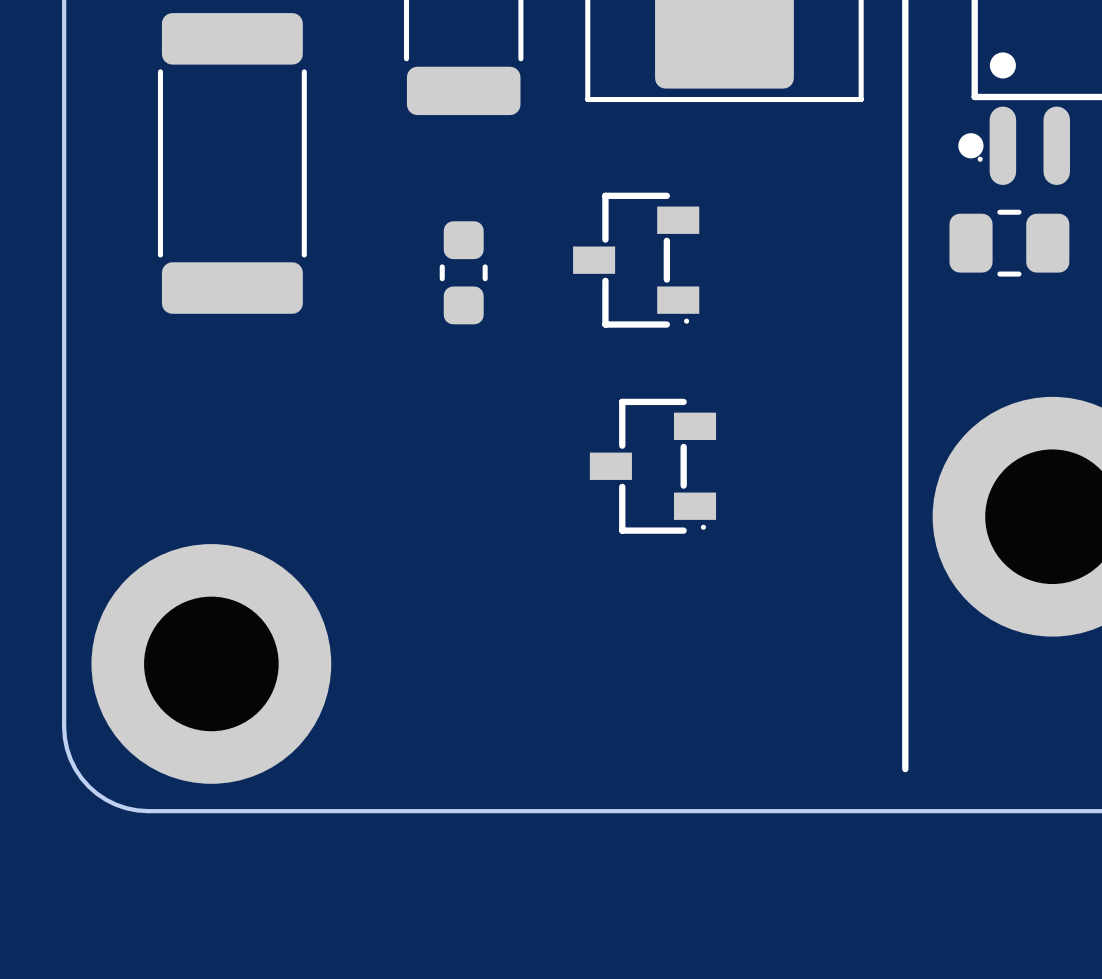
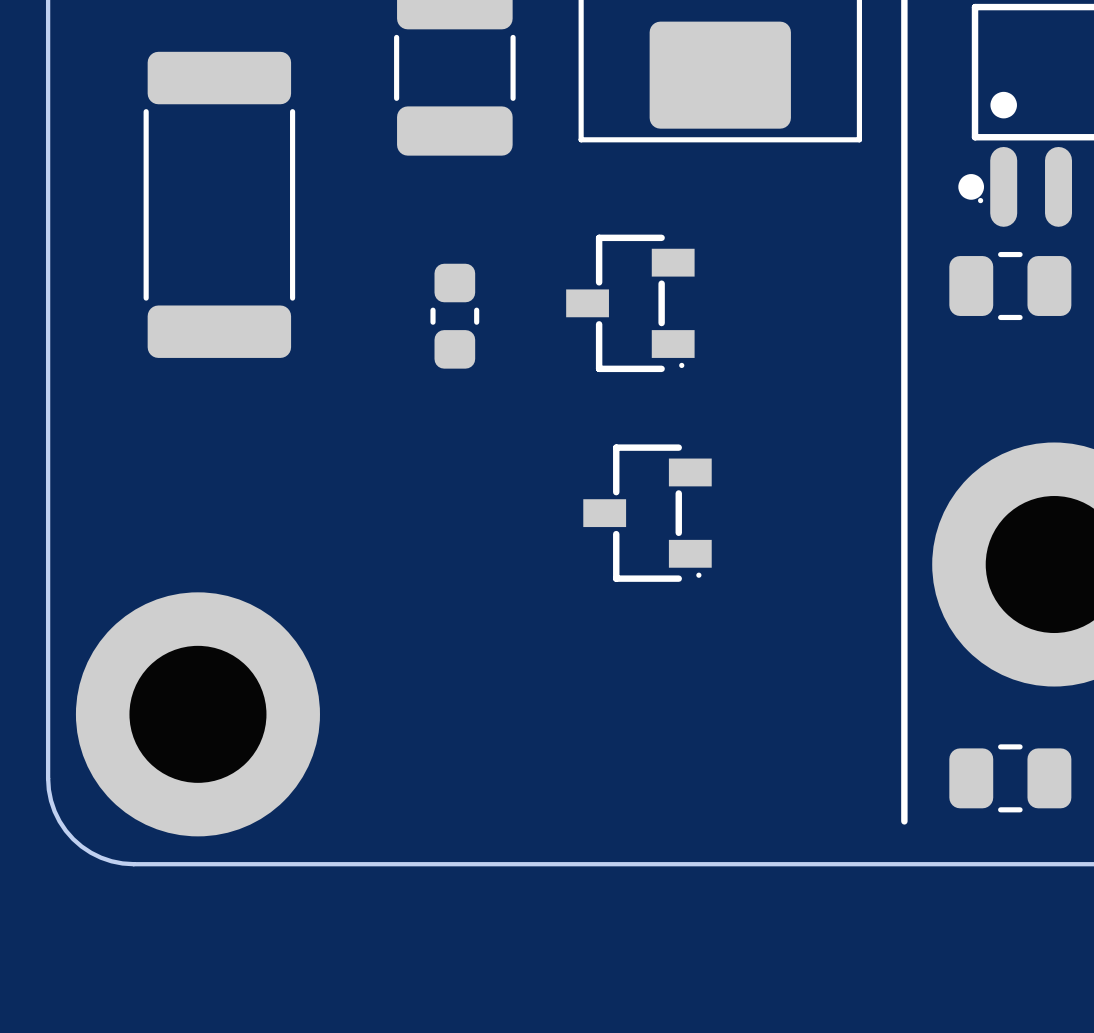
part: none -> (1010, 778)

